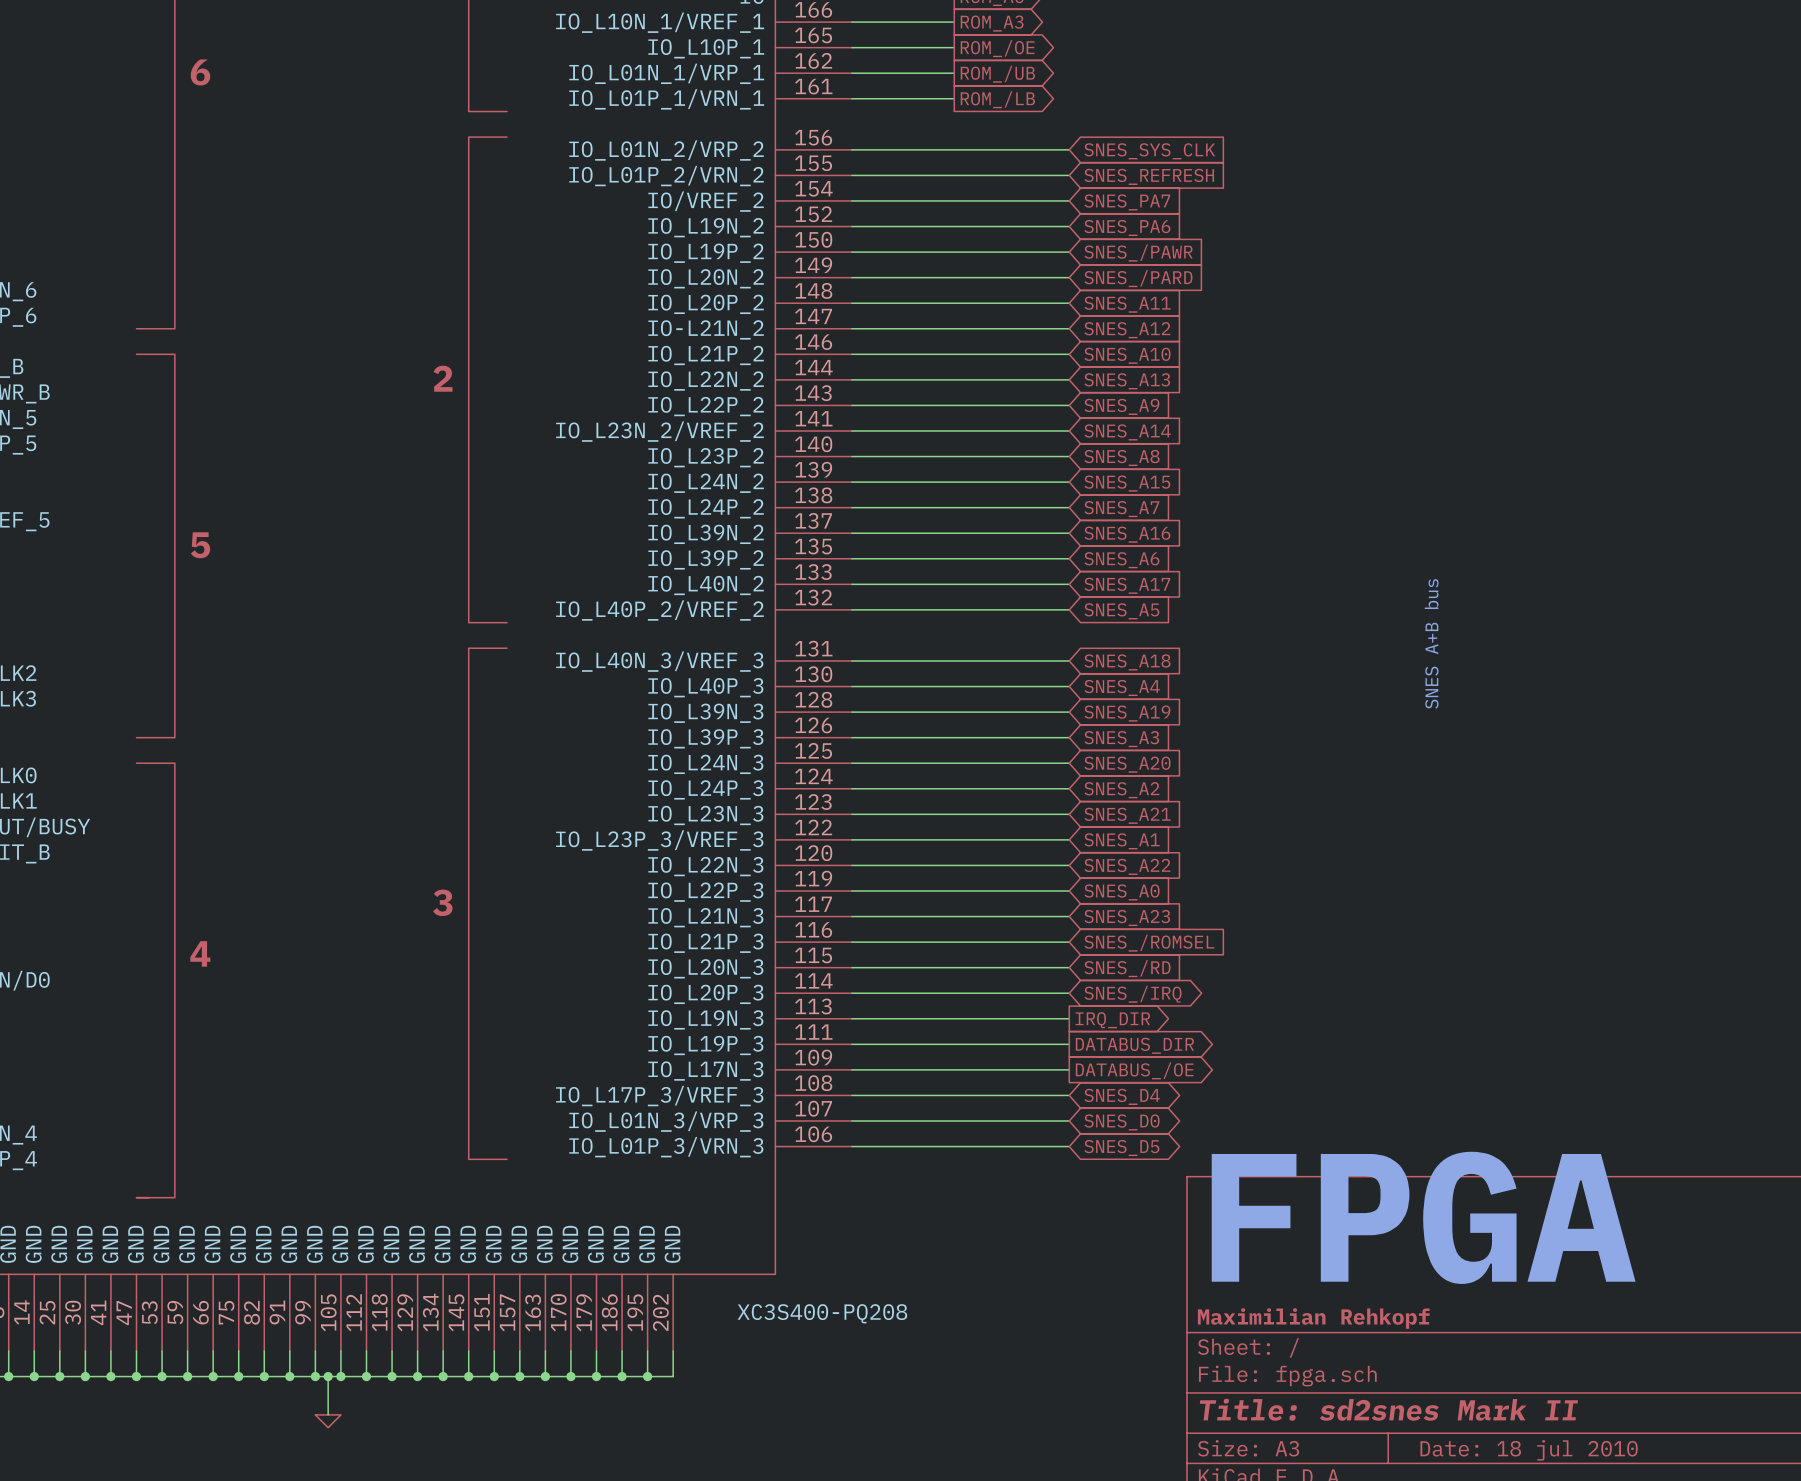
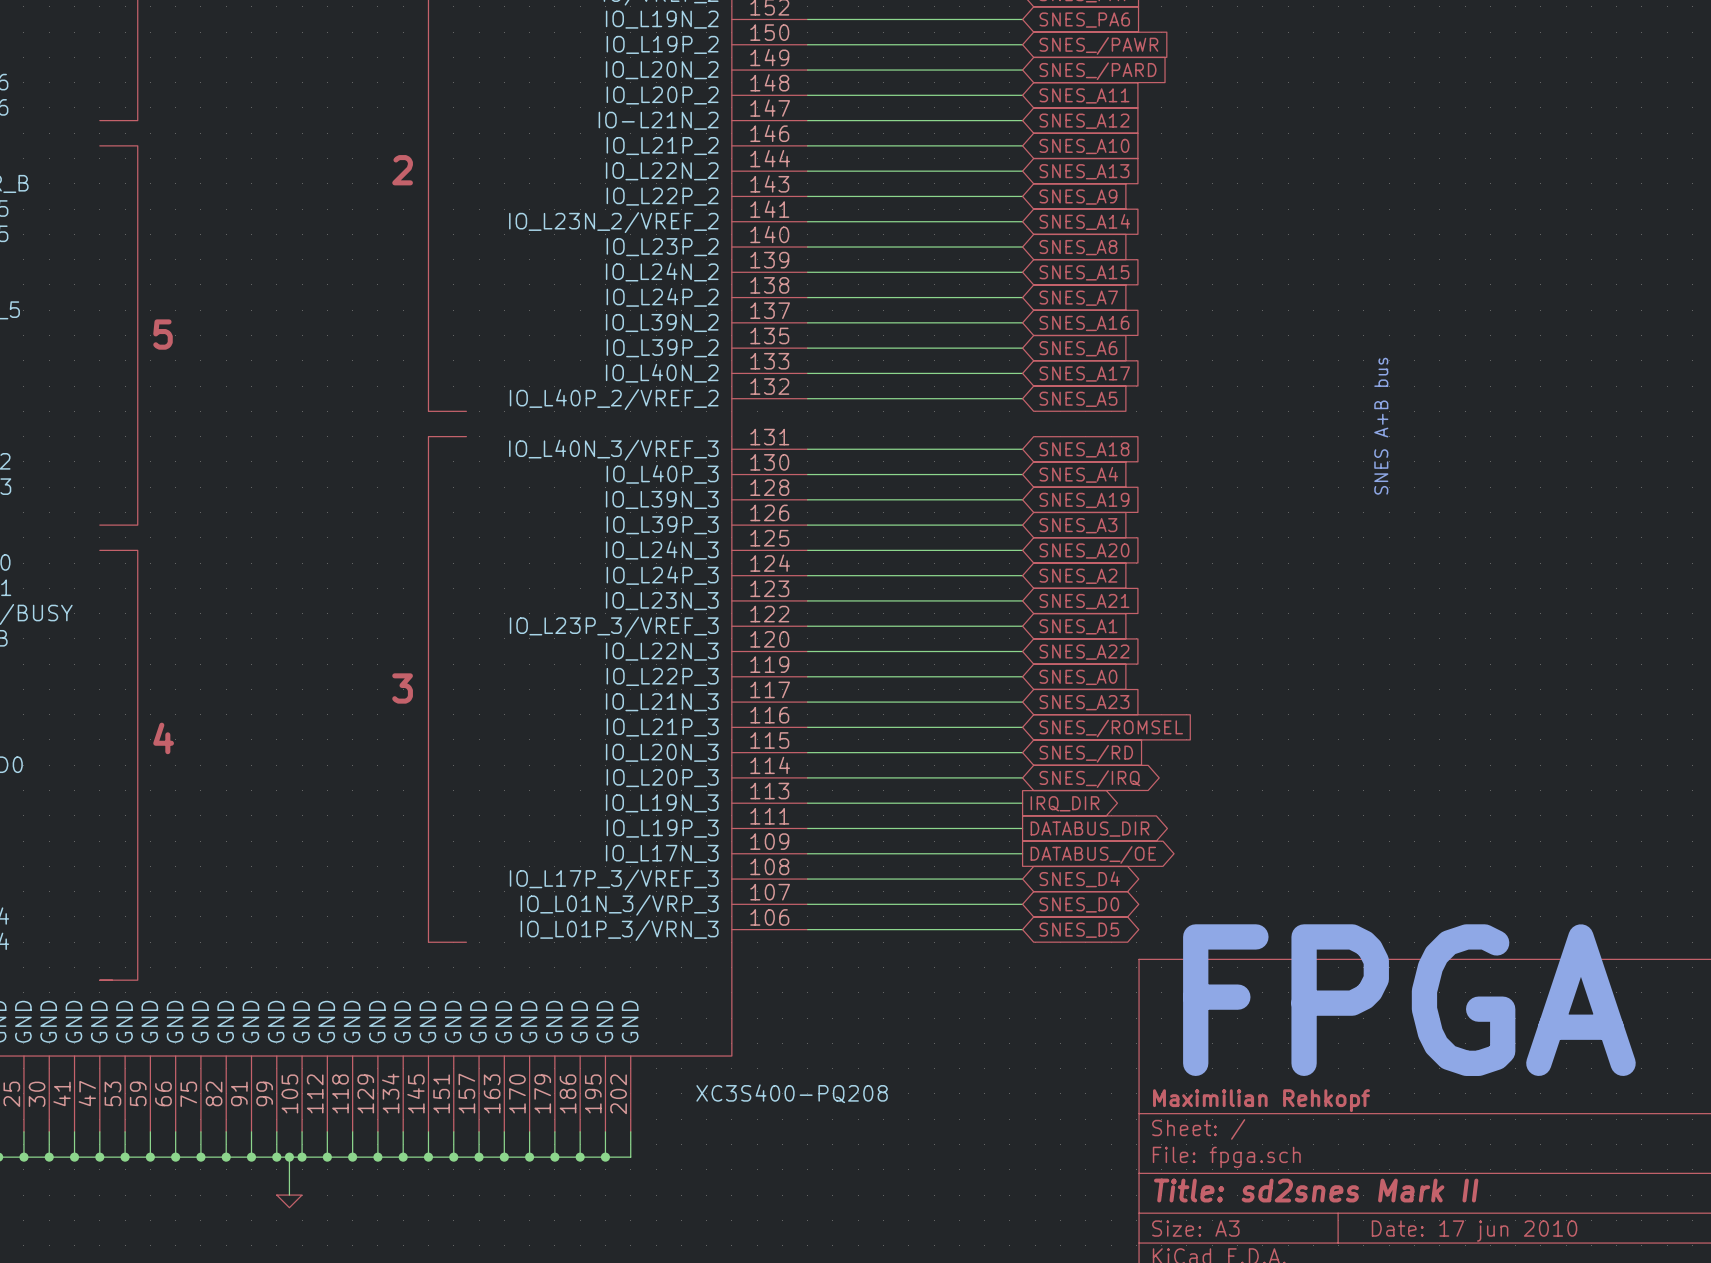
title block: Date: 18 jul 2010 (1529, 1450) -> Date: 17 jun 2010 (1474, 1231)

